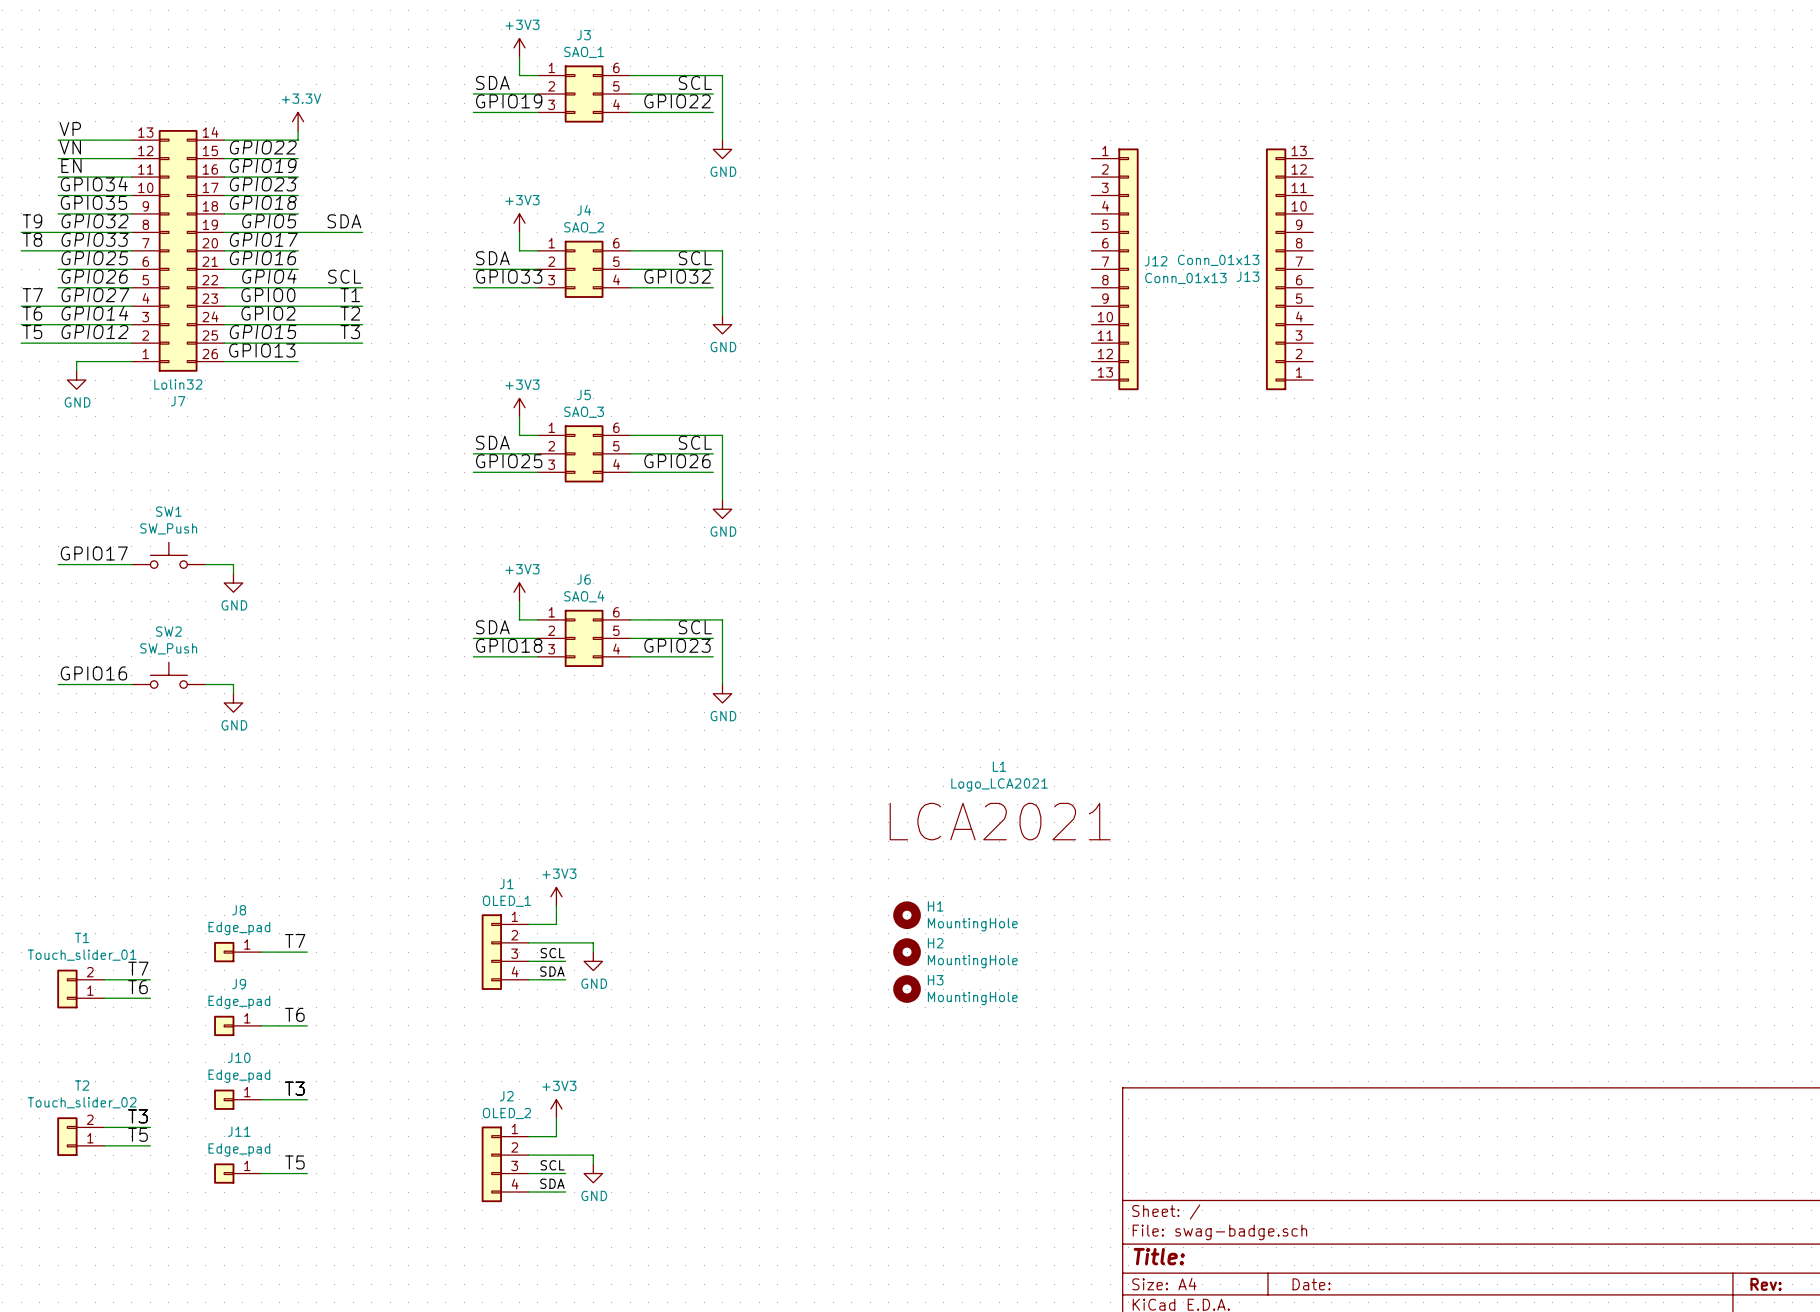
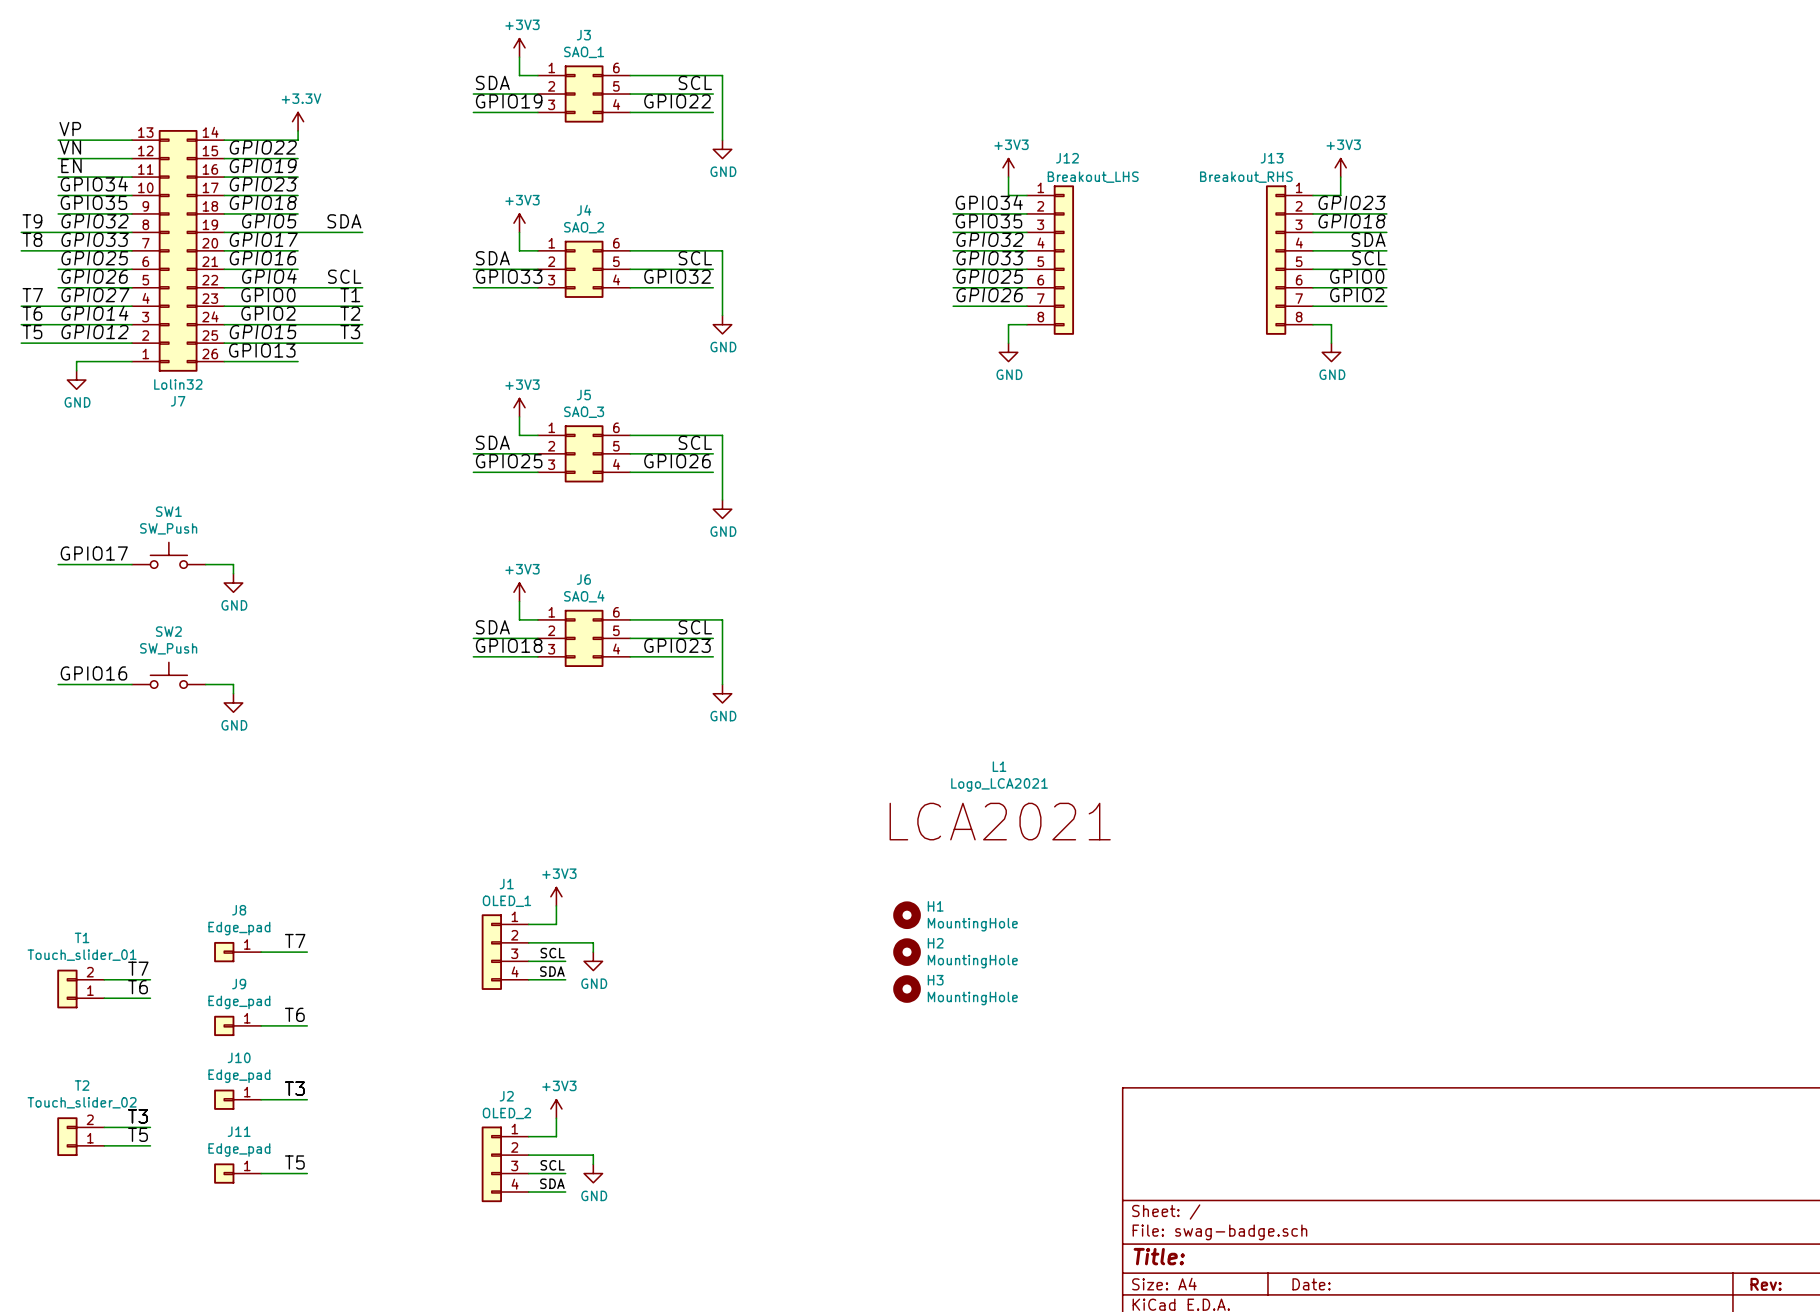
J12 symbol: [1091, 148, 1139, 391] -> [1026, 185, 1075, 335]
J13 symbol: [1265, 148, 1314, 391] -> [1265, 185, 1314, 335]
power symbol: none -> +3V3 (1008, 167)
power symbol: none -> +3V3 (1340, 167)
wire: none -> (1008, 177) (1008, 195) (1026, 195)
wire: none -> (1340, 177) (1340, 195) (1313, 195)
label: none -> GPIO34 (989, 202)
label: none -> GPIO23 (1352, 202)
wire: none -> (953, 213) (1026, 213)
wire: none -> (1313, 213) (1386, 213)
label: none -> GPIO35 (988, 221)
label: none -> GPIO18 (1352, 221)
wire: none -> (953, 232) (1026, 232)
wire: none -> (1313, 232) (1386, 232)
label: none -> GPIO32 (989, 239)
label: none -> SDA (1368, 239)
wire: none -> (953, 250) (1026, 250)
wire: none -> (1313, 250) (1386, 250)
label: none -> GPIO33 (990, 258)
label: none -> SCL (1368, 258)
J13 value: Conn_01x13 (1218, 260) -> Breakout_RHS (1246, 177)
J12 name position: J12 (1156, 261) -> J12 (1067, 158)
wire: none -> (953, 269) (1026, 269)
wire: none -> (1313, 269) (1386, 269)
label: none -> GPIO25 (989, 276)
J13 name position: J13 (1248, 276) -> J13 (1272, 158)
label: none -> GPIO0 (1357, 276)
J12 value: Conn_01x13 (1185, 278) -> Breakout_LHS (1093, 177)
wire: none -> (953, 287) (1026, 287)
wire: none -> (1313, 287) (1386, 287)
label: none -> GPIO26 (989, 295)
label: none -> GPIO2 (1357, 295)
wire: none -> (953, 306) (1026, 306)
wire: none -> (1313, 306) (1386, 306)
wire: none -> (1026, 324) (1008, 324) (1008, 343)
wire: none -> (1313, 324) (1331, 324) (1331, 343)
power symbol: none -> GND (1008, 352)
power symbol: none -> GND (1331, 352)

